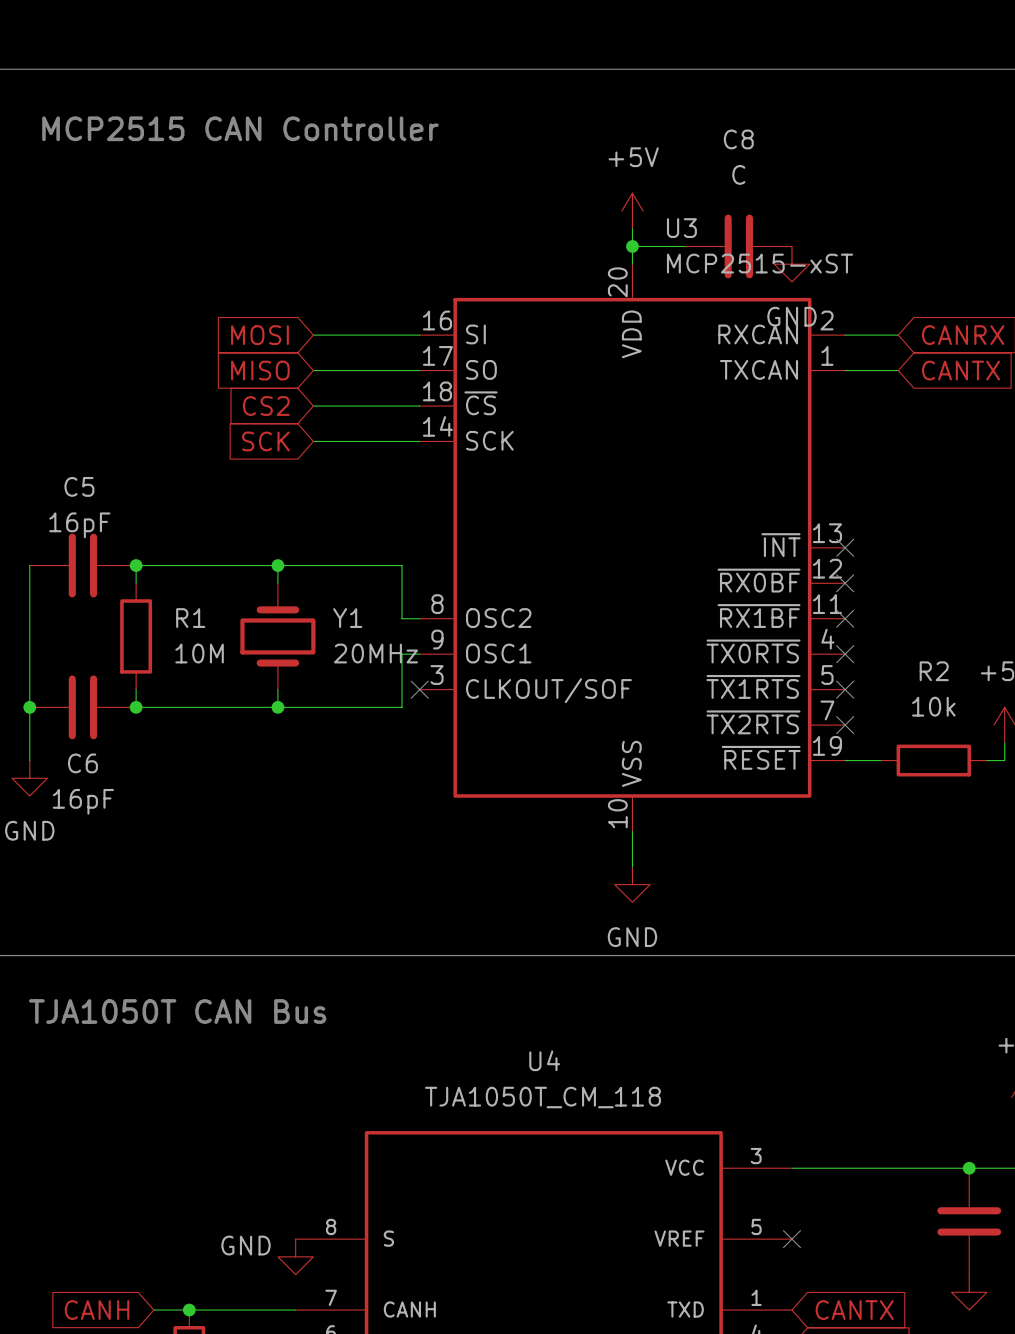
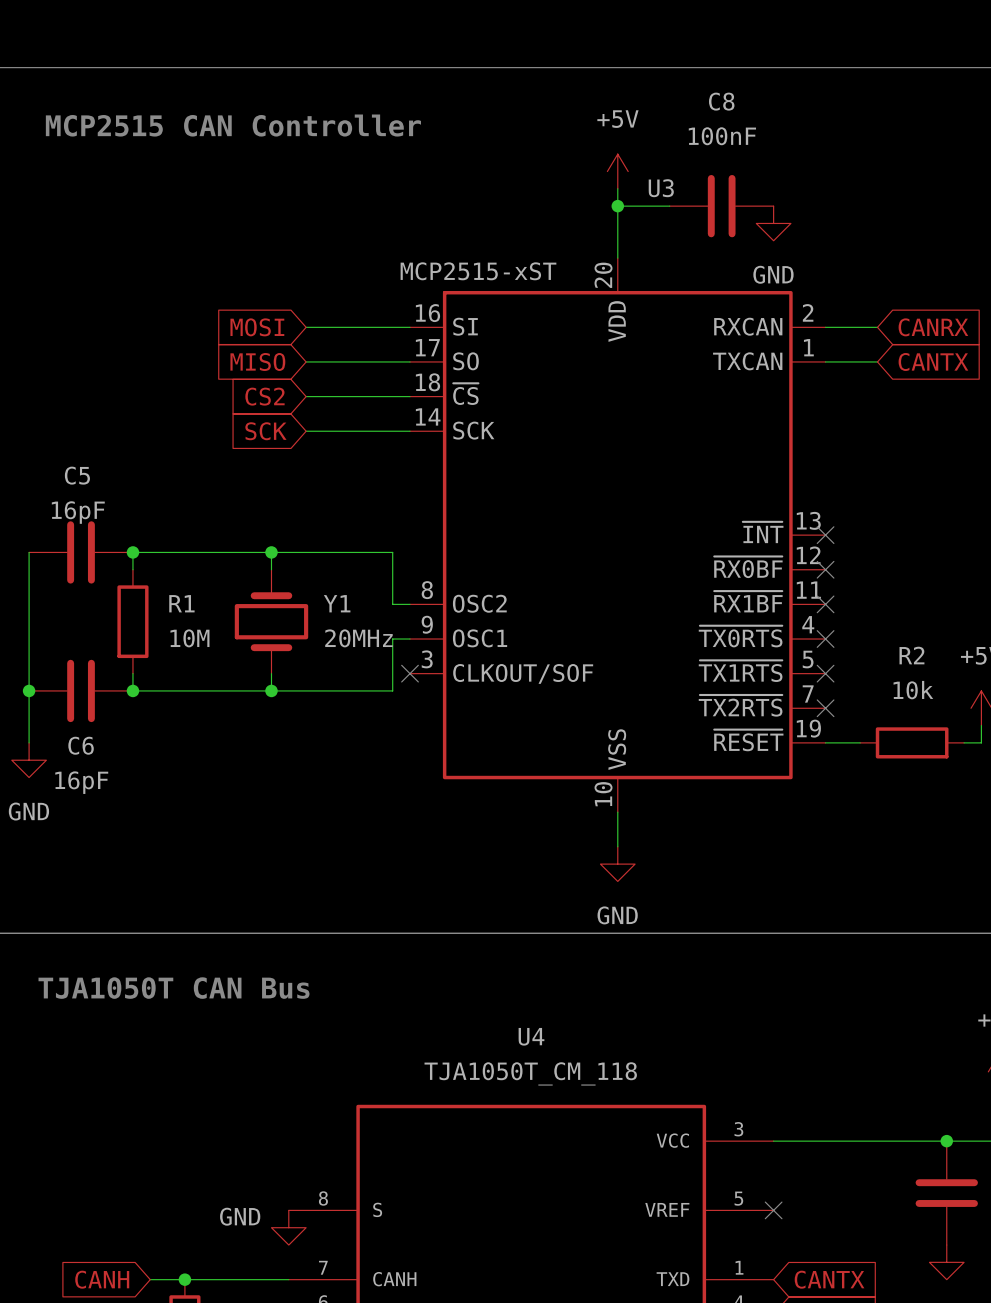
C8 value: C (738, 174) -> 100nF (722, 136)
power symbol position: +5V (632, 211) -> +5V (617, 171)
U3 name position: U3 (681, 228) -> U3 (661, 188)
wire: (632, 246) (685, 246) -> (617, 206) (669, 206)
junction position: (632, 246) -> (617, 206)
C8 position: (738, 246) -> (721, 206)
U3 value position: MCP2515-xST (759, 263) -> MCP2515-xST (478, 271)
power symbol position: GND (791, 264) -> GND (773, 223)

